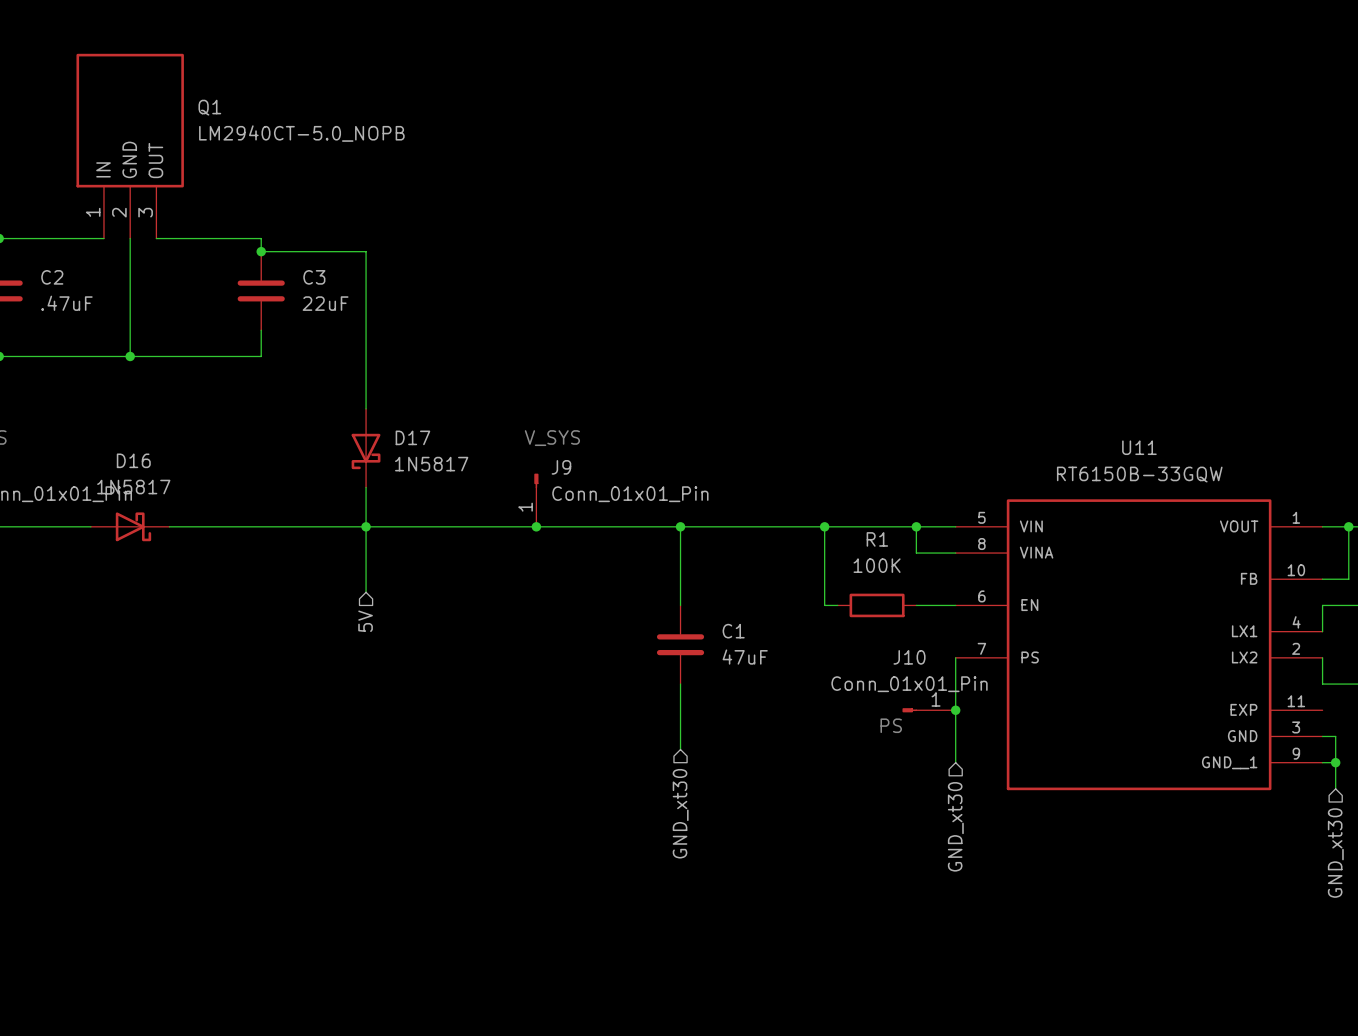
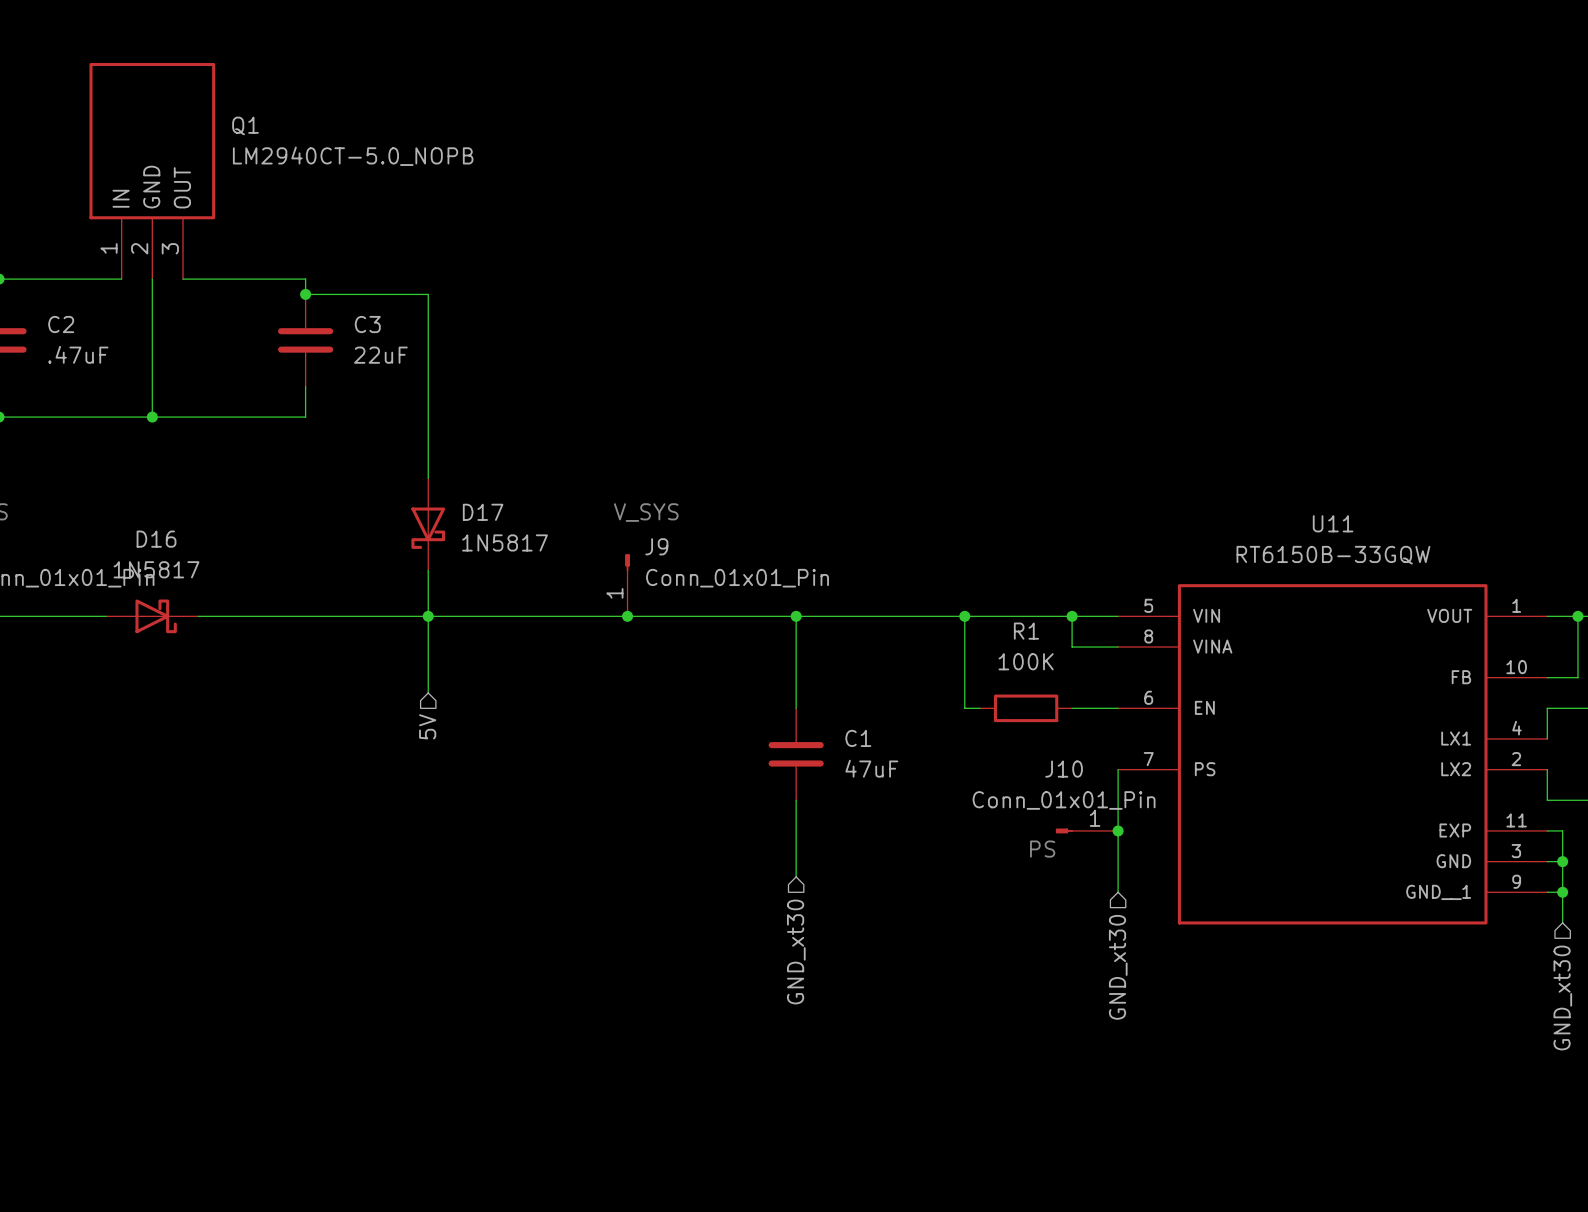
wire: none -> (1547, 830) (1562, 830) (1562, 861)
junction: none -> (1562, 861)

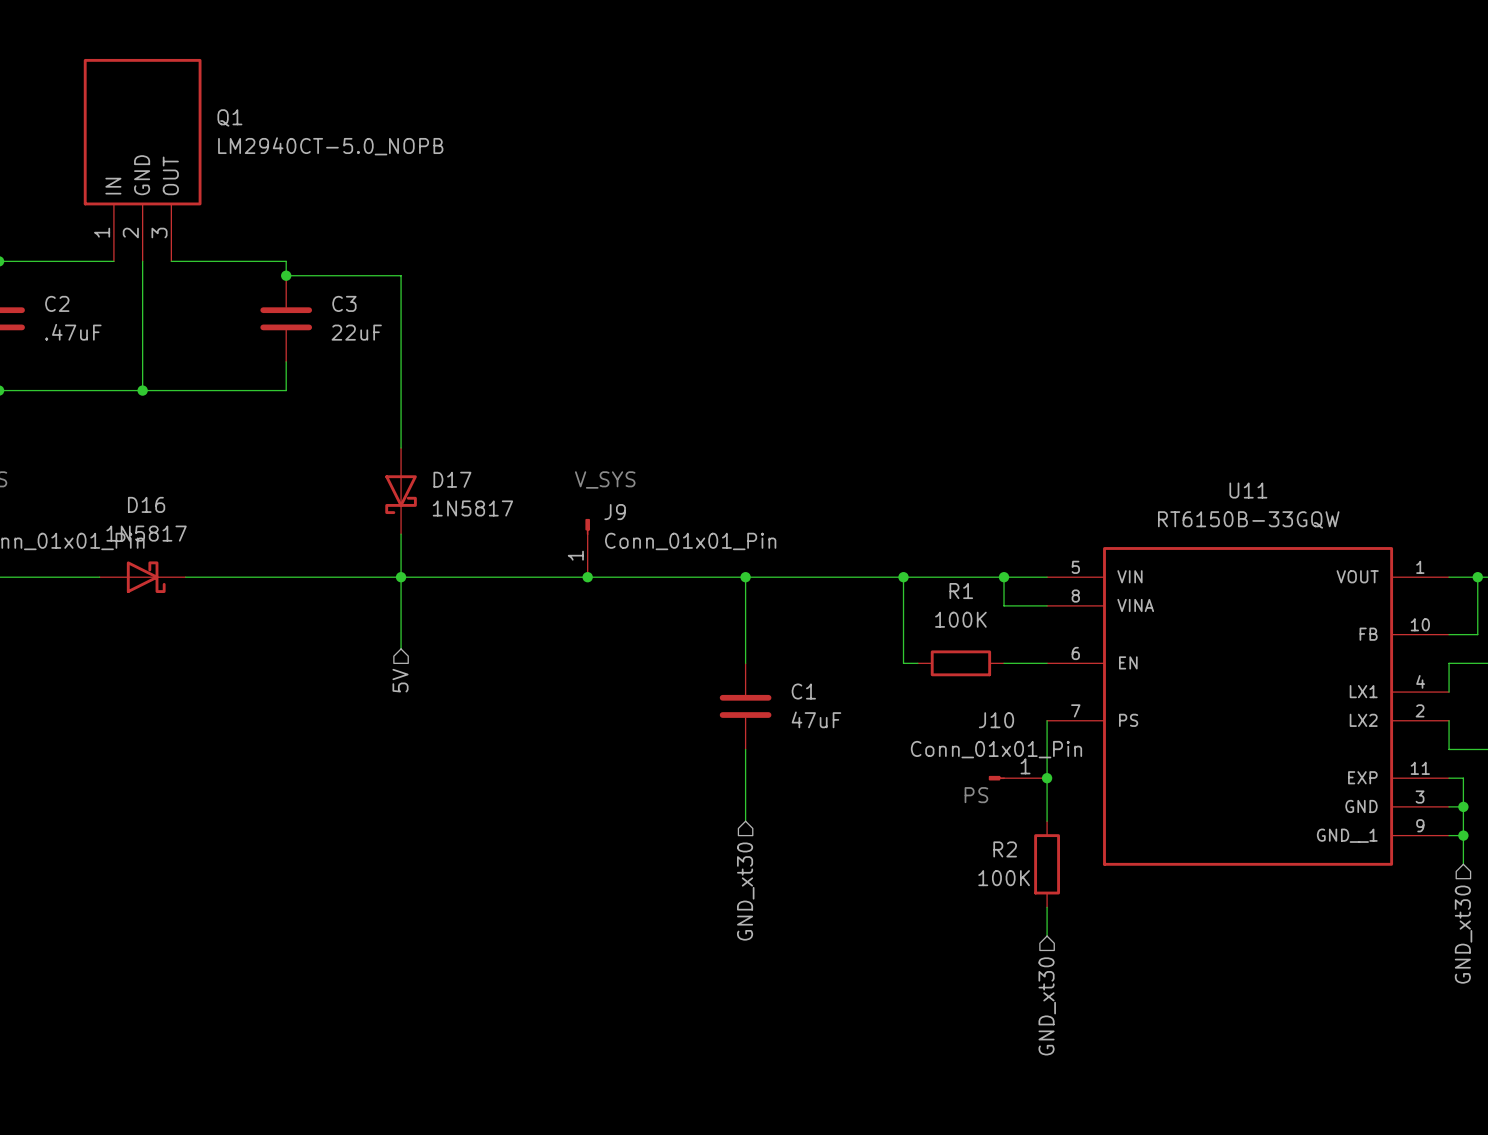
R2: none -> 100K (1047, 864)
hierarchical label position: GND_xt30 (1118, 967) -> GND_xt30 (1047, 1006)
wire: none -> (1047, 907) (1047, 936)

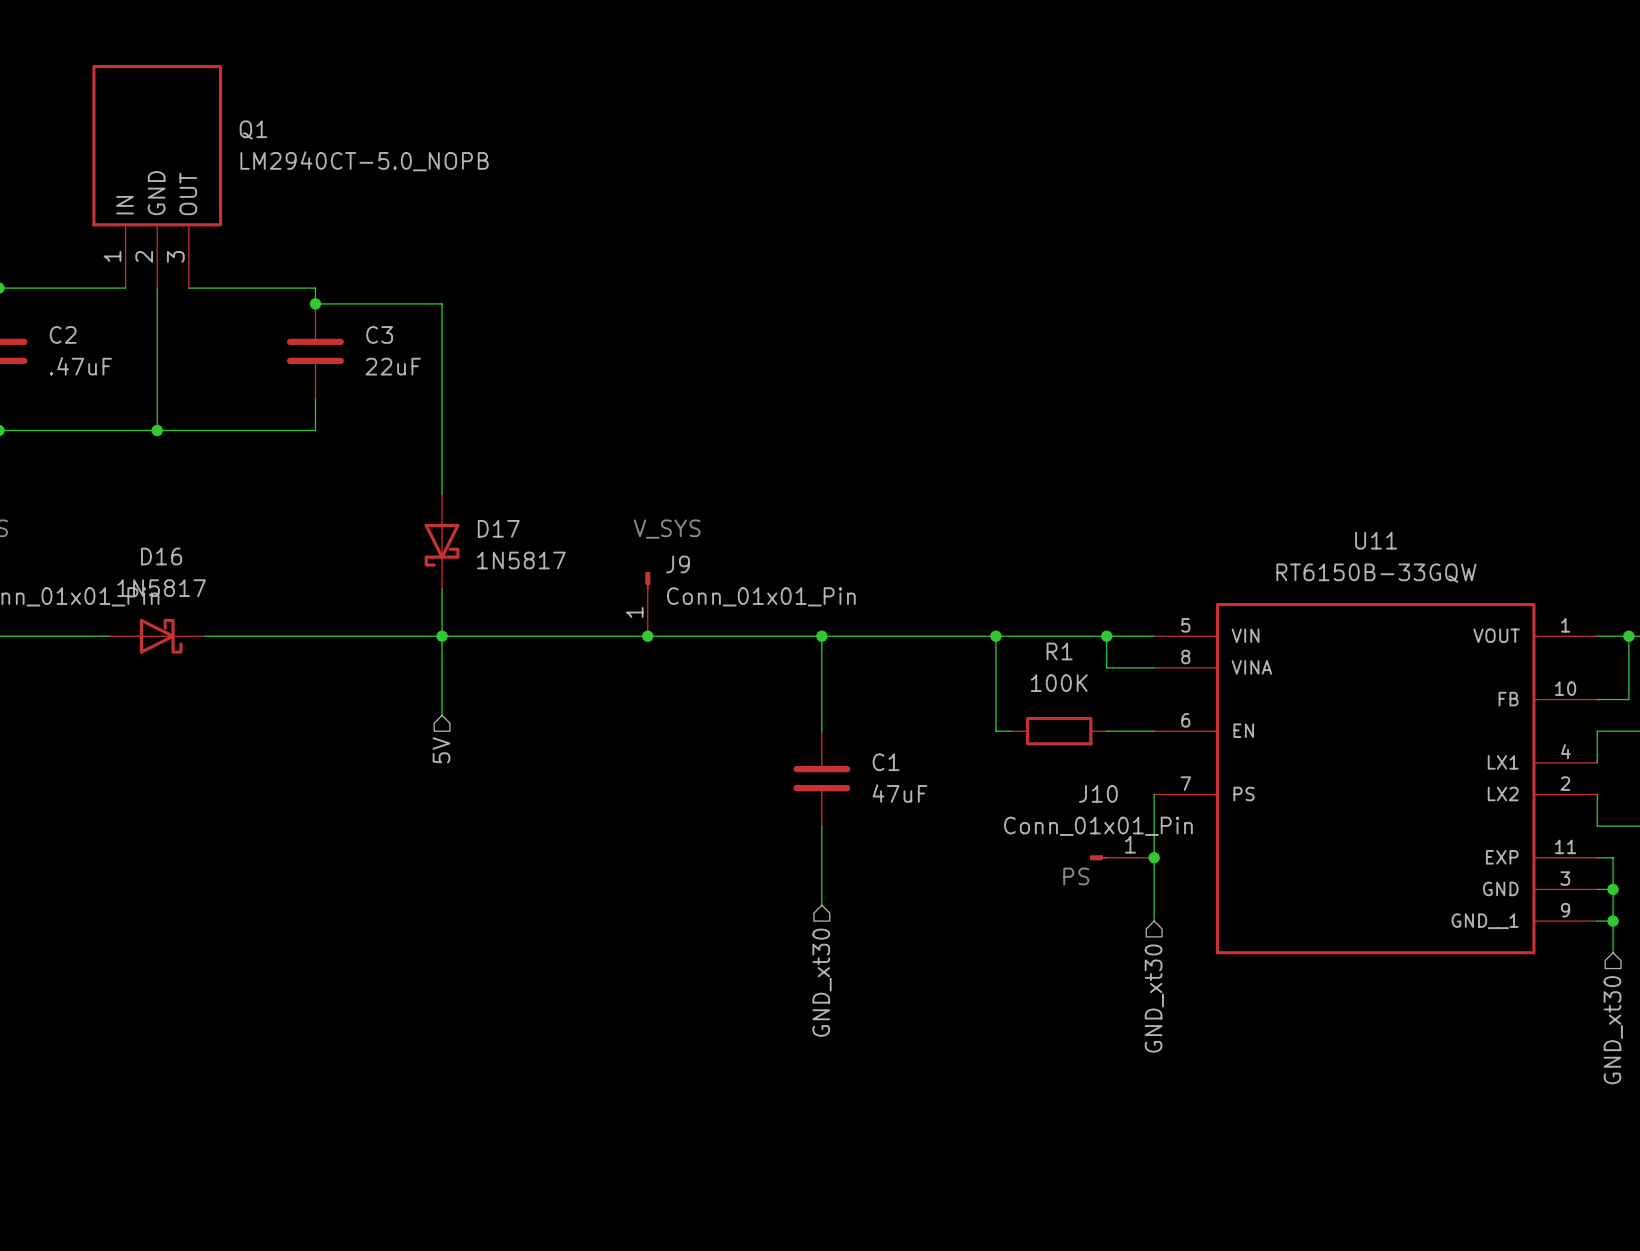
R2: 100K (1047, 864) -> none
wire: (1047, 907) (1047, 936) -> none
hierarchical label position: GND_xt30 (1047, 1006) -> GND_xt30 (1154, 998)

